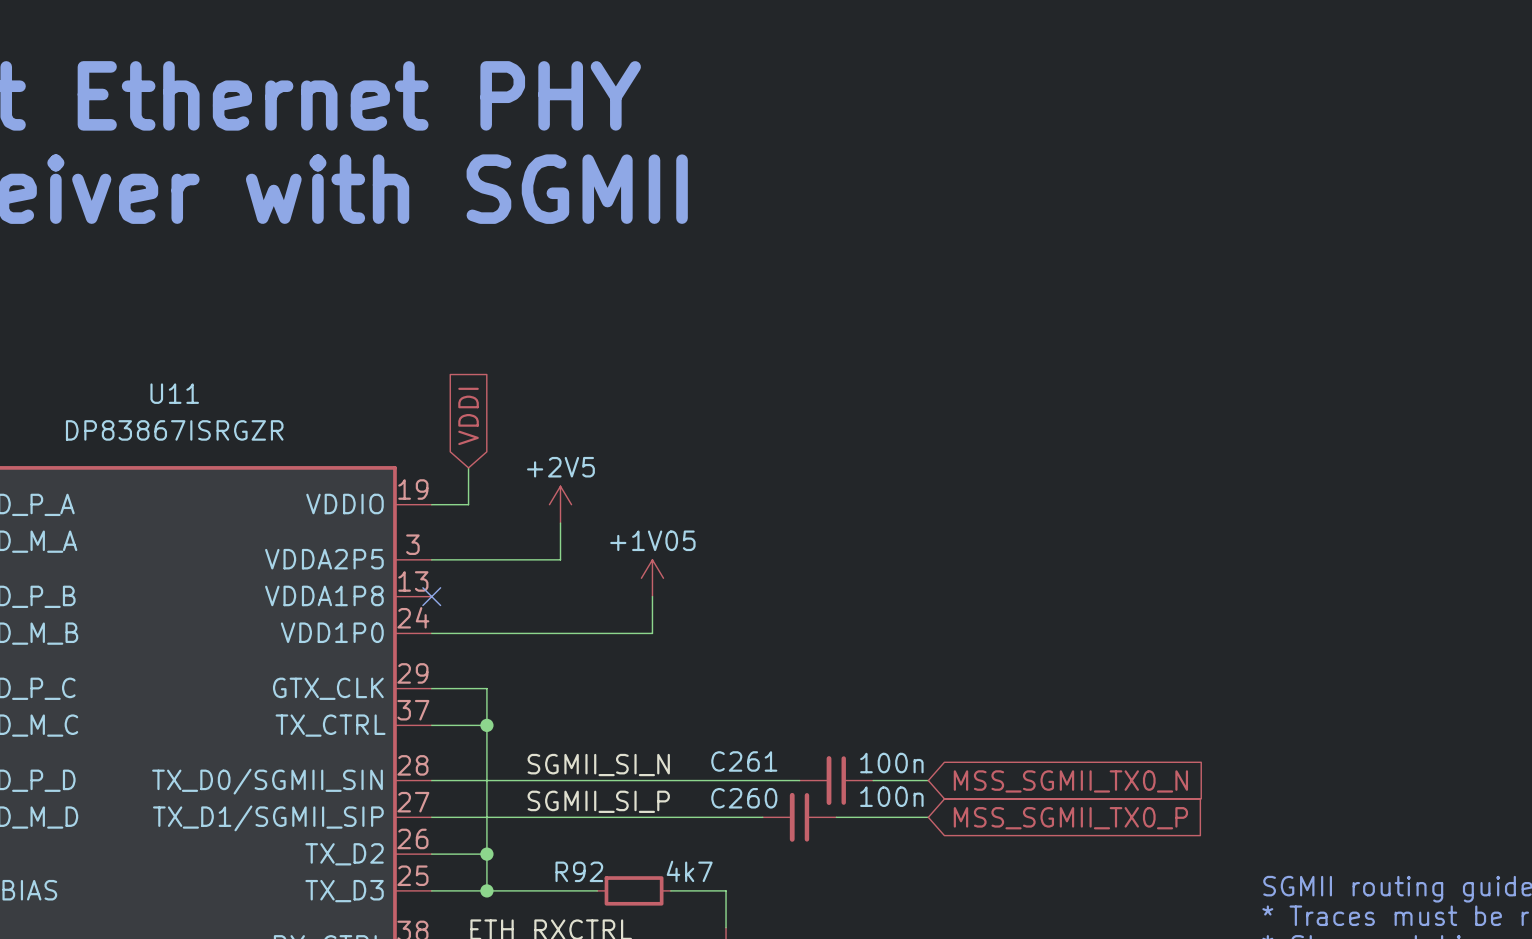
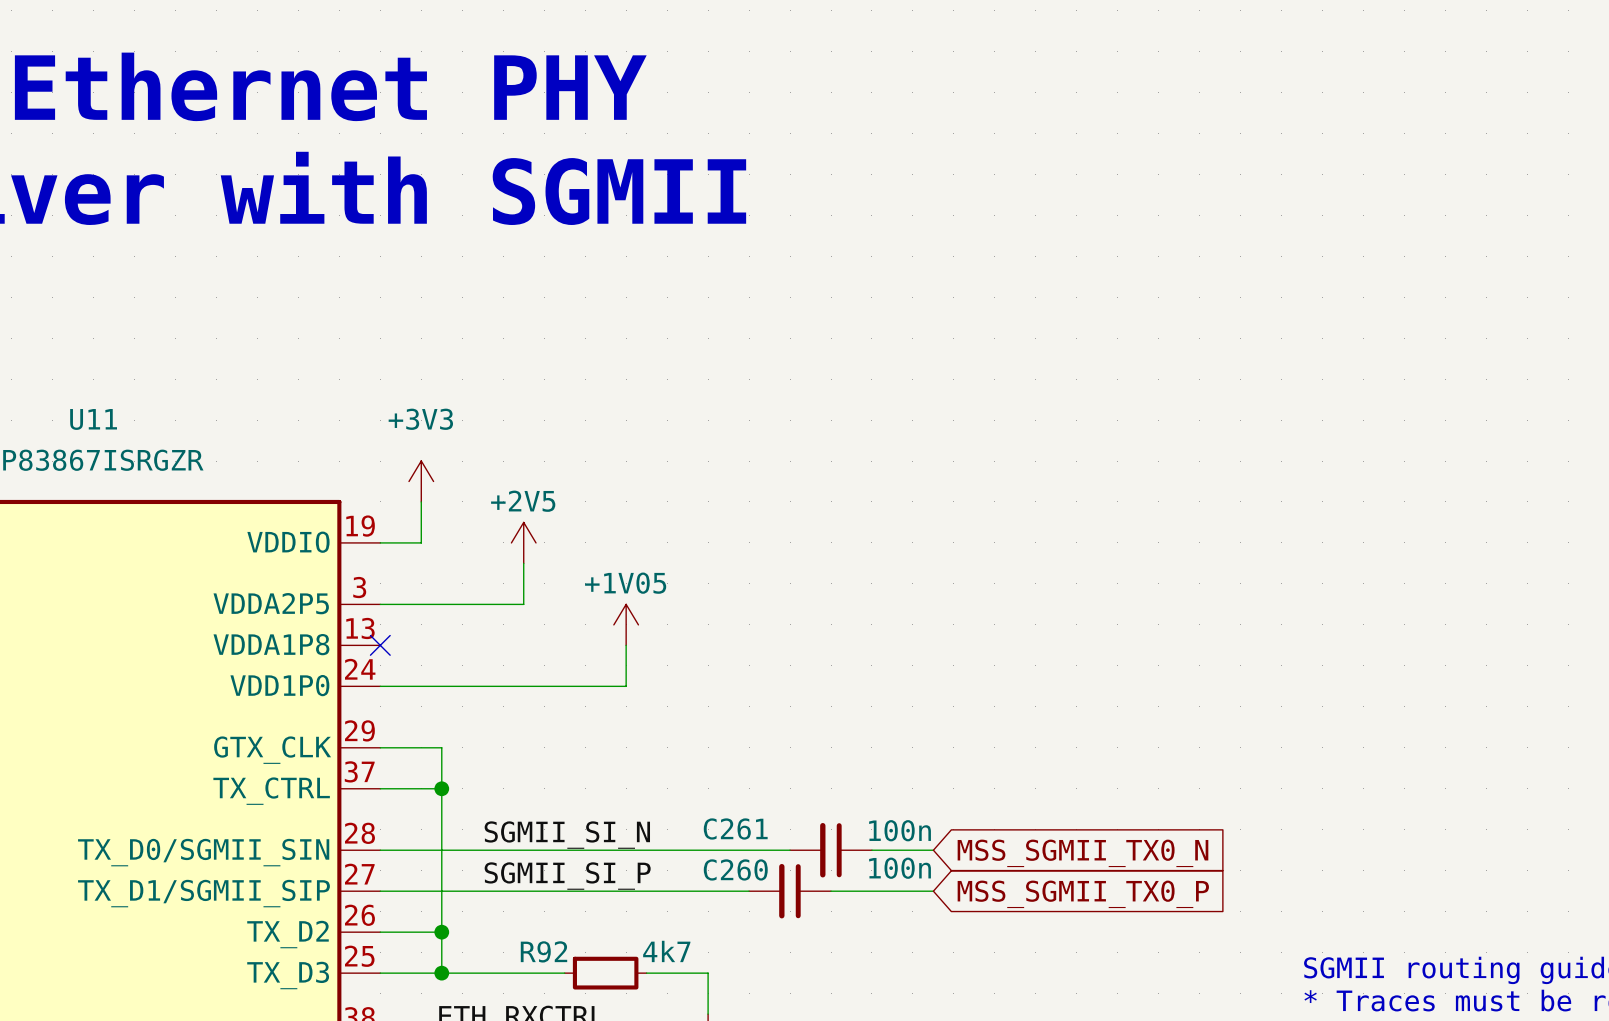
global label: VDDI (468, 416) -> none
power symbol: none -> +3V3 (421, 481)

